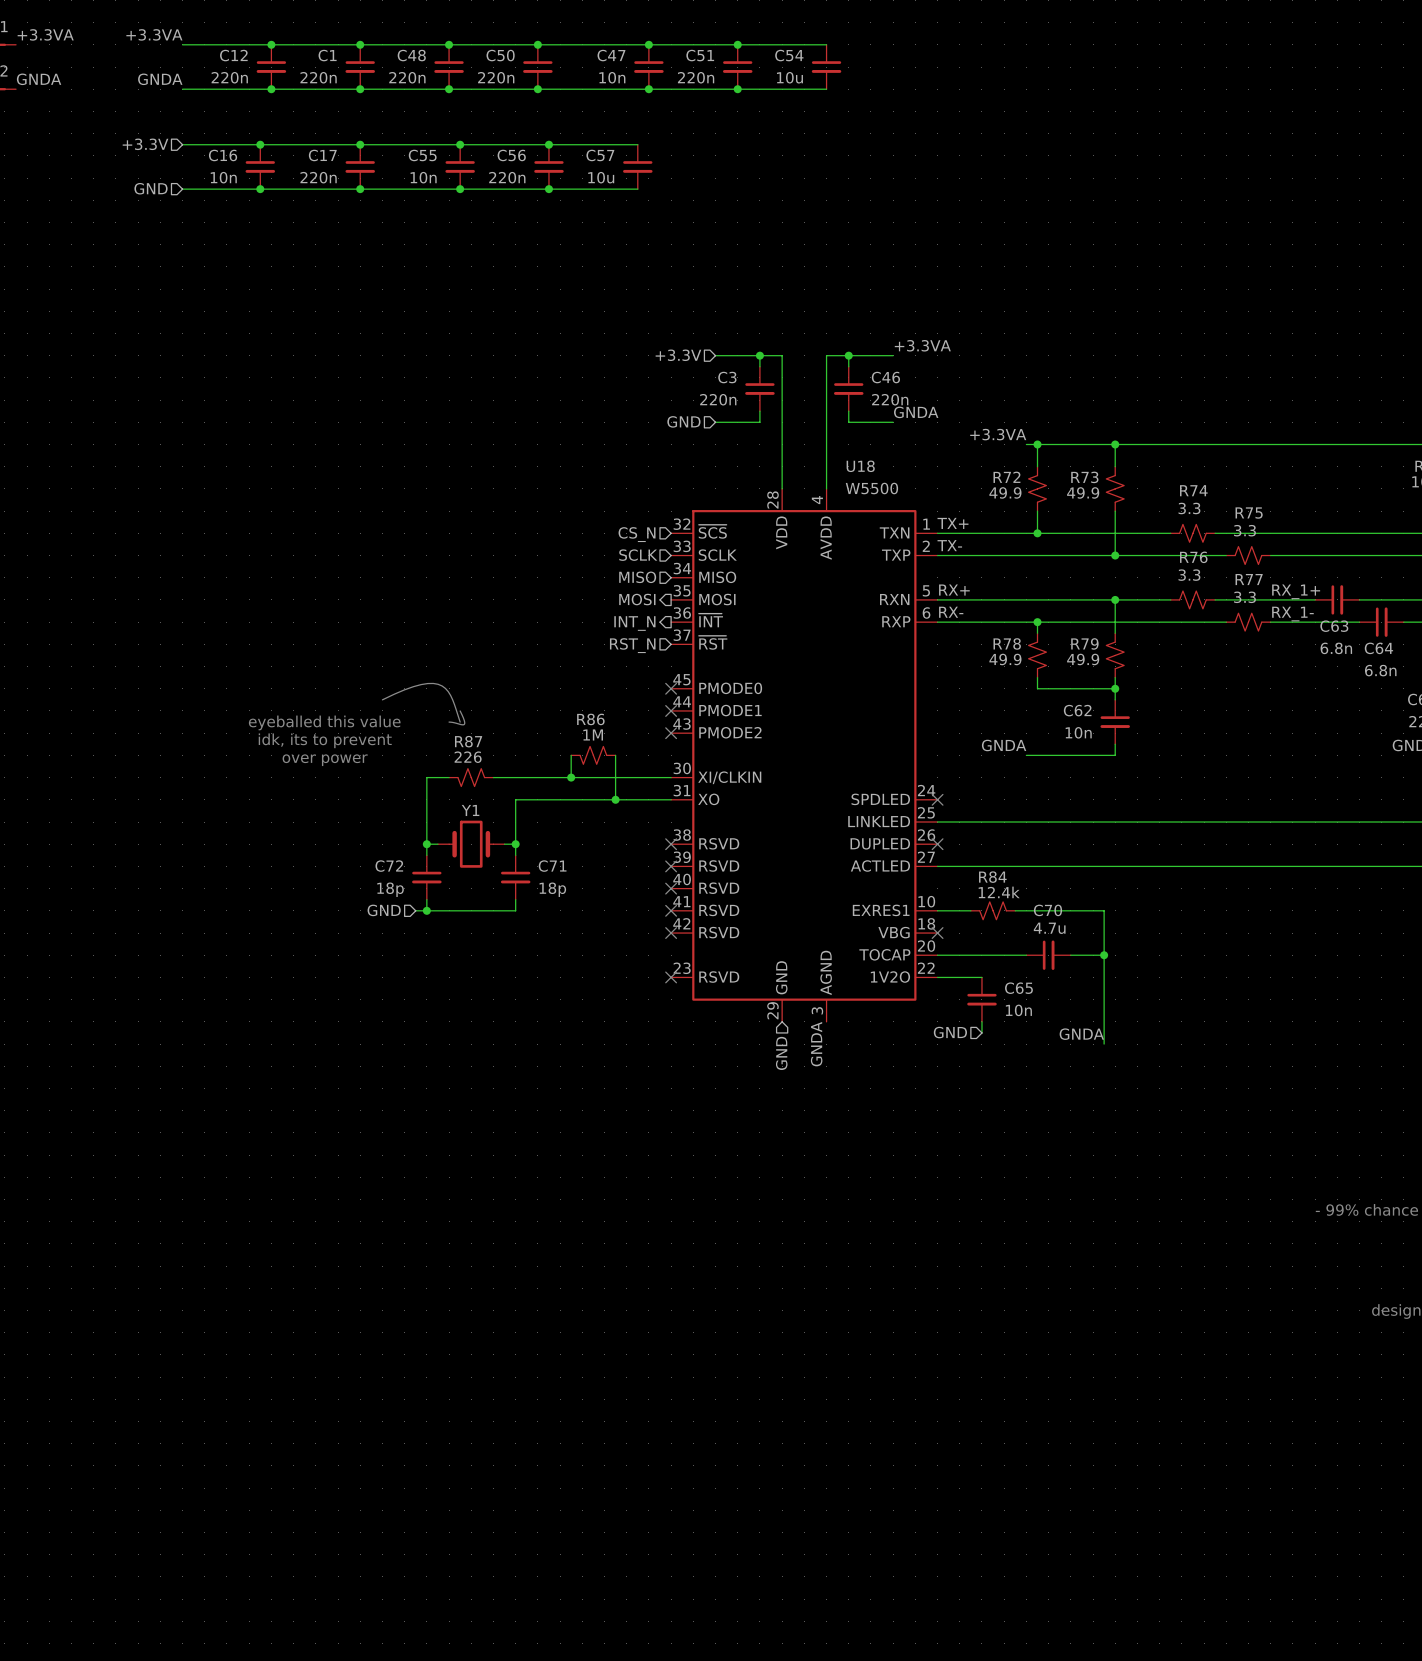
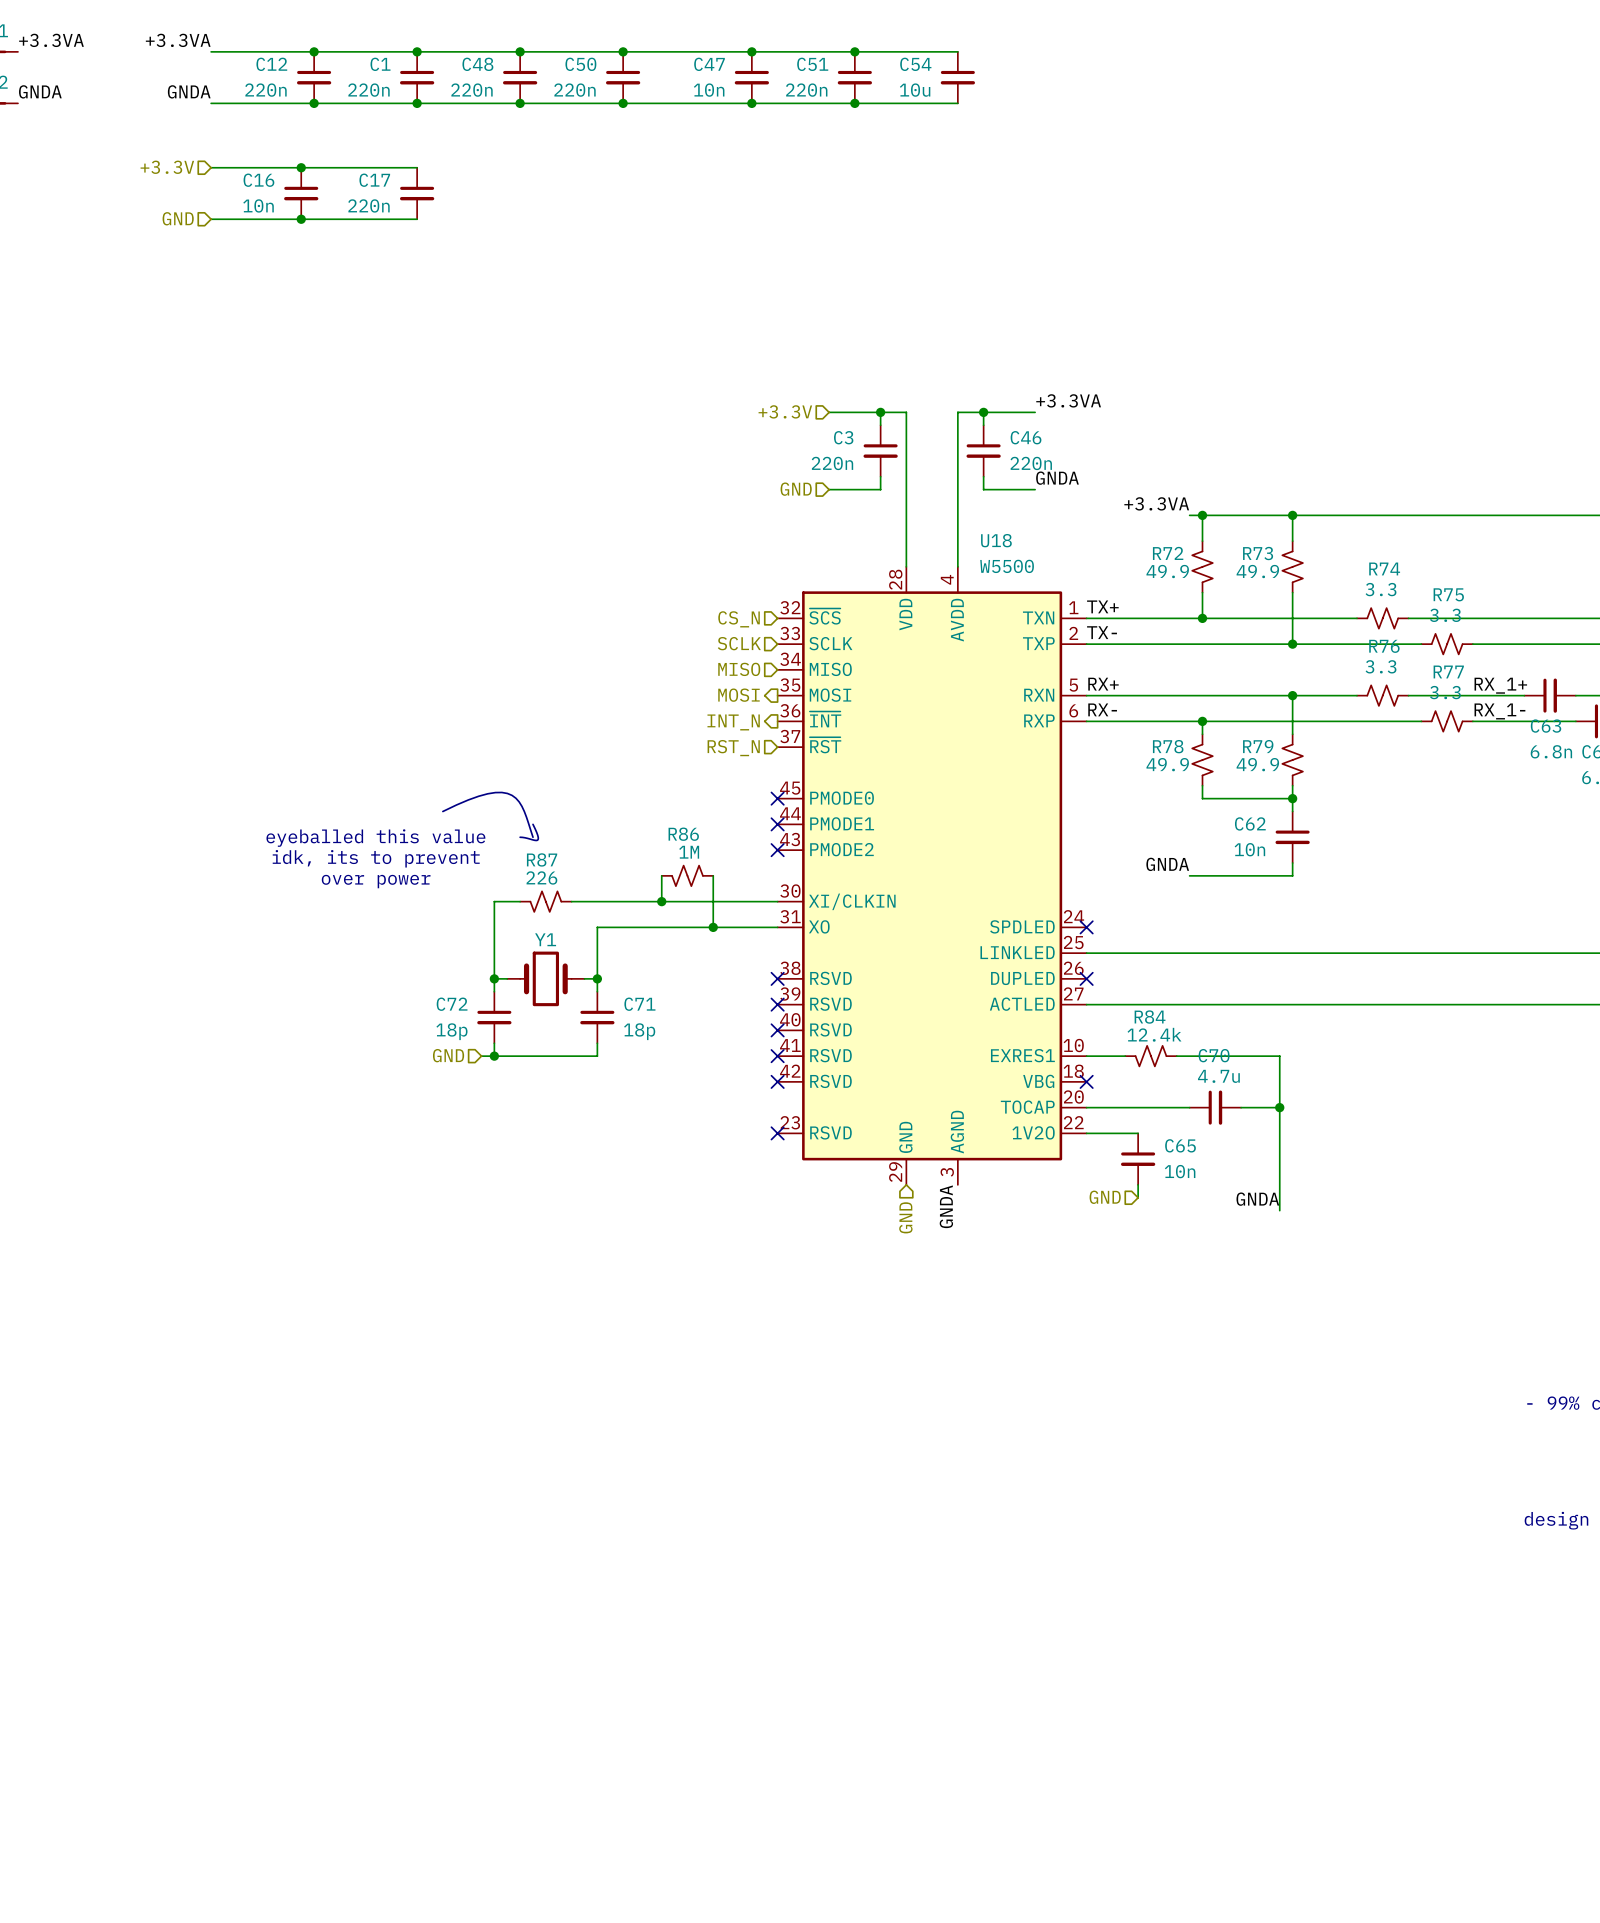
wire: (360, 144) (637, 144) -> none
junction: (360, 144) -> none
junction: (460, 144) -> none
junction: (548, 144) -> none
C55: 10n (460, 166) -> none
C56: 220n (548, 166) -> none
C57: 10u (637, 166) -> none
wire: (360, 189) (637, 189) -> none
junction: (360, 189) -> none
junction: (460, 189) -> none
junction: (548, 189) -> none

